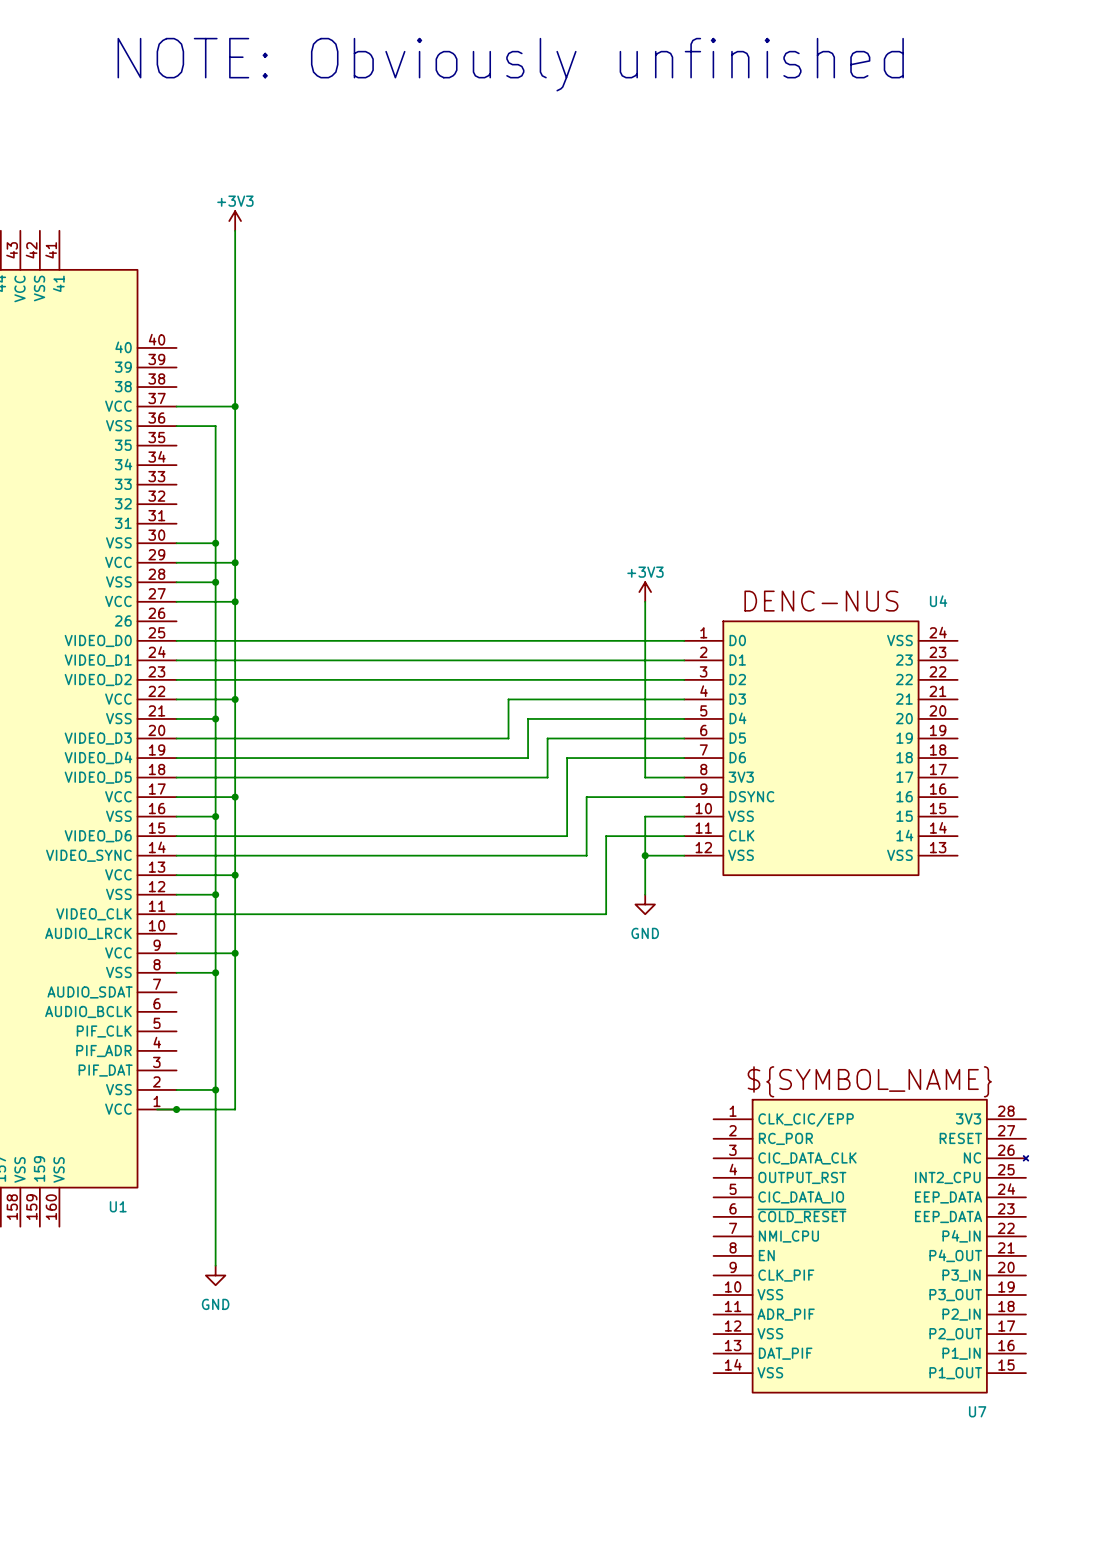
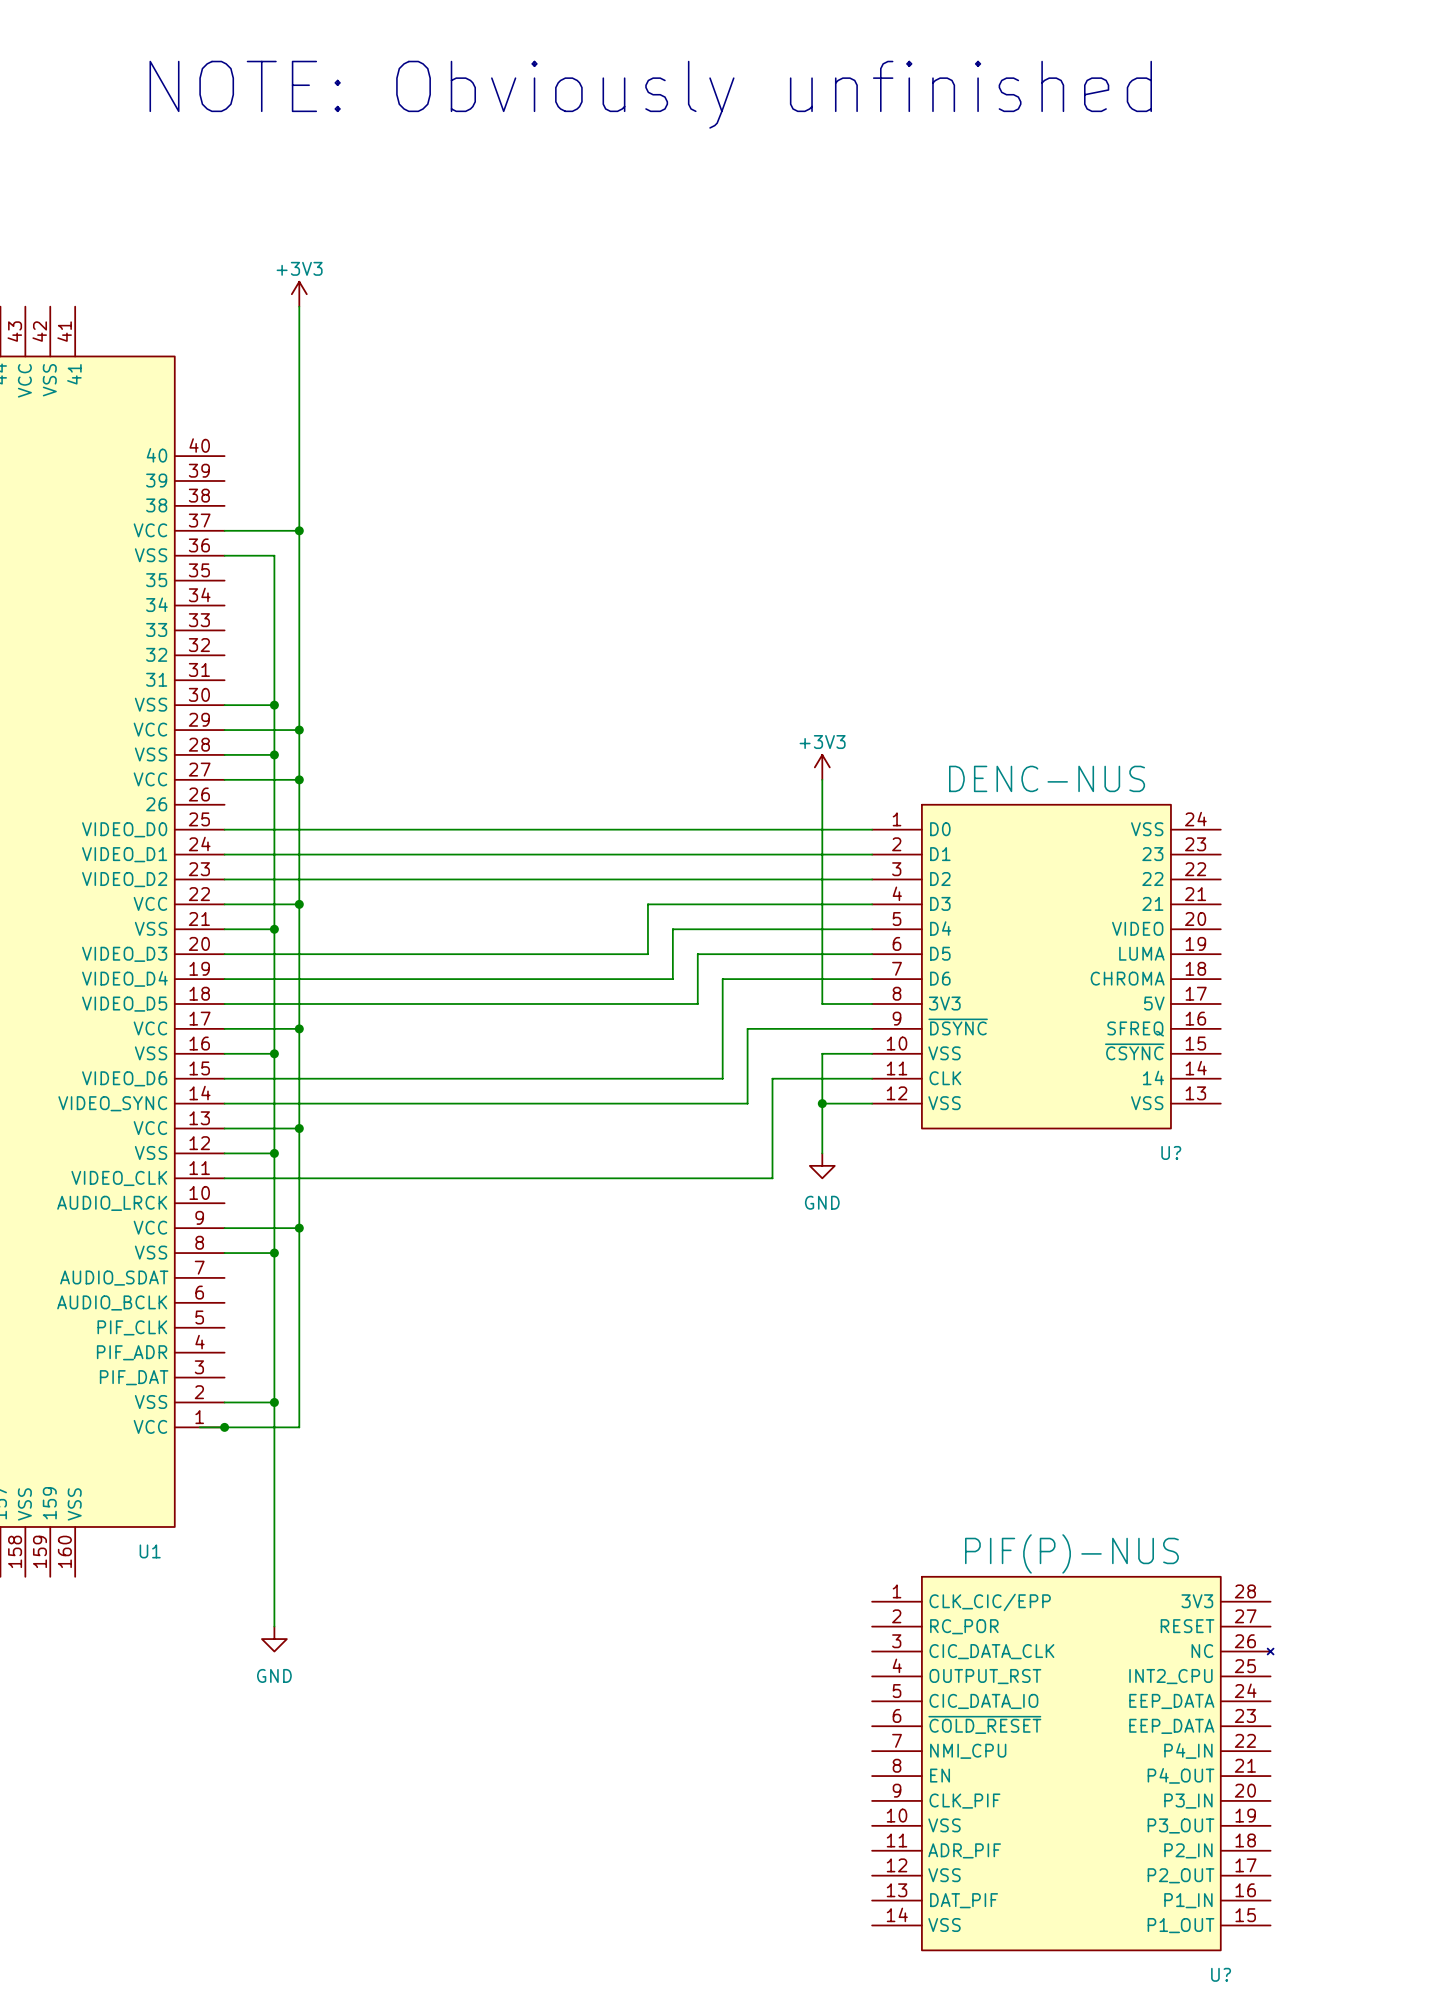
U4 text: DENC-NUS (821, 601) -> none
U4 value: none -> DENC-NUS (1047, 778)
U4 name: U4 (938, 601) -> U? (1171, 1152)
U4 pin name: 20 (904, 718) -> VIDEO (1137, 928)
U4 pin name: 19 (904, 738) -> LUMA (1141, 953)
U4 pin name: 18 (904, 757) -> CHROMA (1127, 978)
U4 pin name: 17 (904, 777) -> 5V (1154, 1003)
U4 pin name: DSYNC (751, 796) -> ~{DSYNC} (958, 1027)
U4 pin name: 16 (904, 796) -> SFREQ (1135, 1029)
U4 pin name: 15 (904, 816) -> ~{CSYNC} (1134, 1051)
U7: (870, 1246) -> none
U?: none -> PIF(P)-NUS (1072, 1763)

